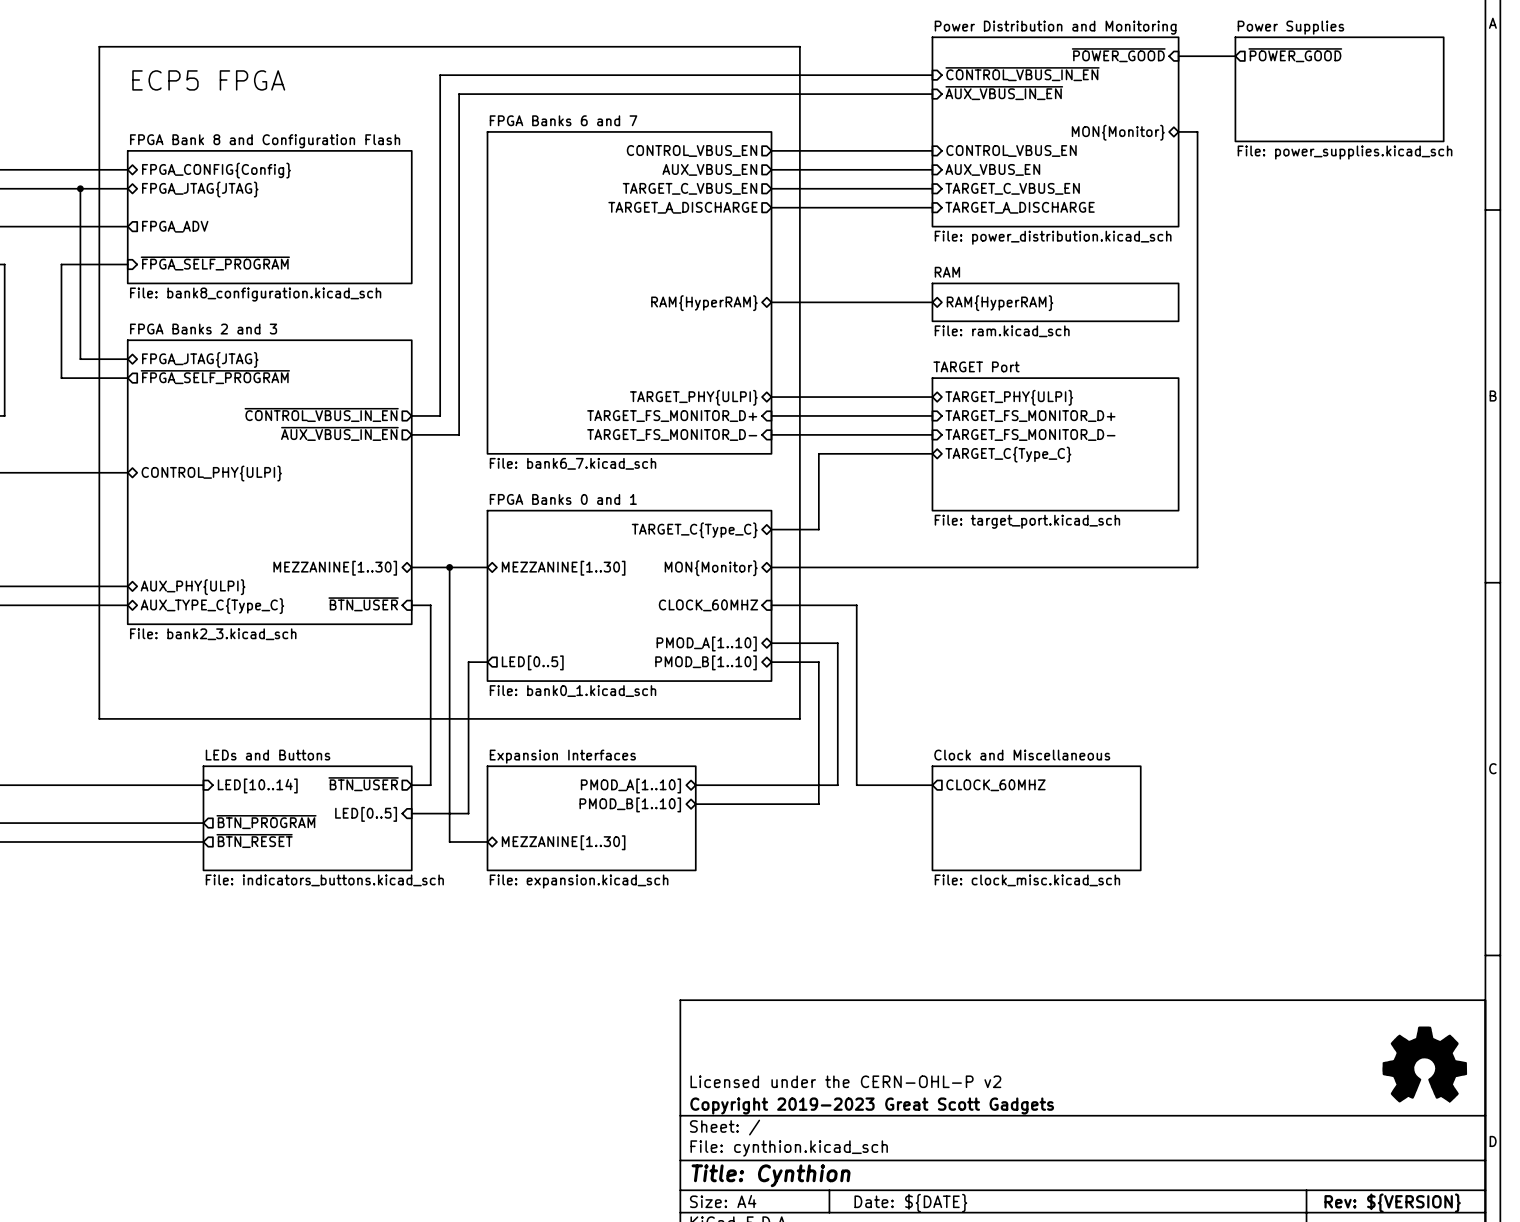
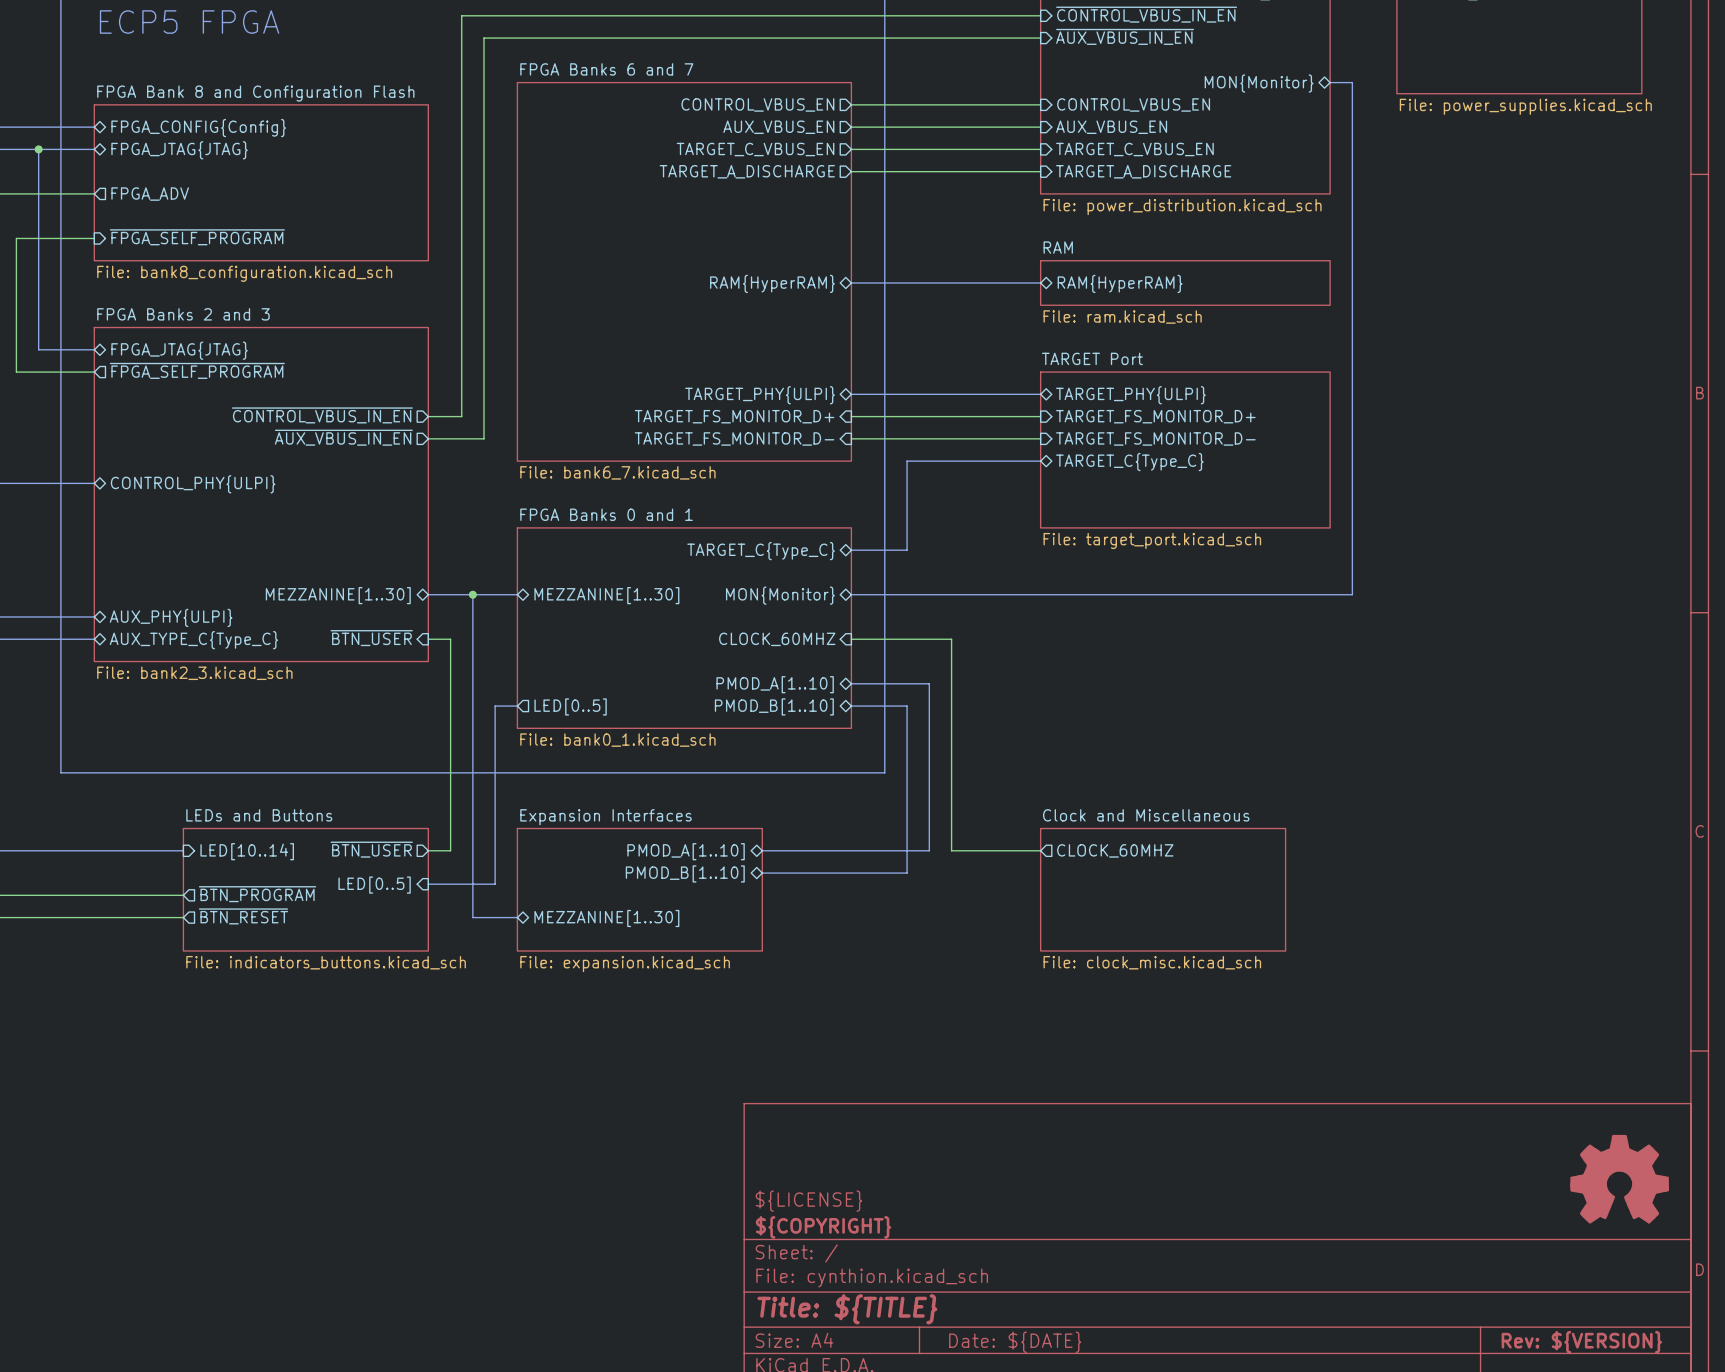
title block: Licensed under the CERN-OHL-P v2 (845, 1081) -> ${LICENSE} (808, 1201)
title block: Copyright 2019-2023 Great Scott Gadgets (872, 1105) -> ${COPYRIGHT} (823, 1227)
title block: Title: Cynthion (771, 1175) -> Title: ${TITLE} (847, 1309)

